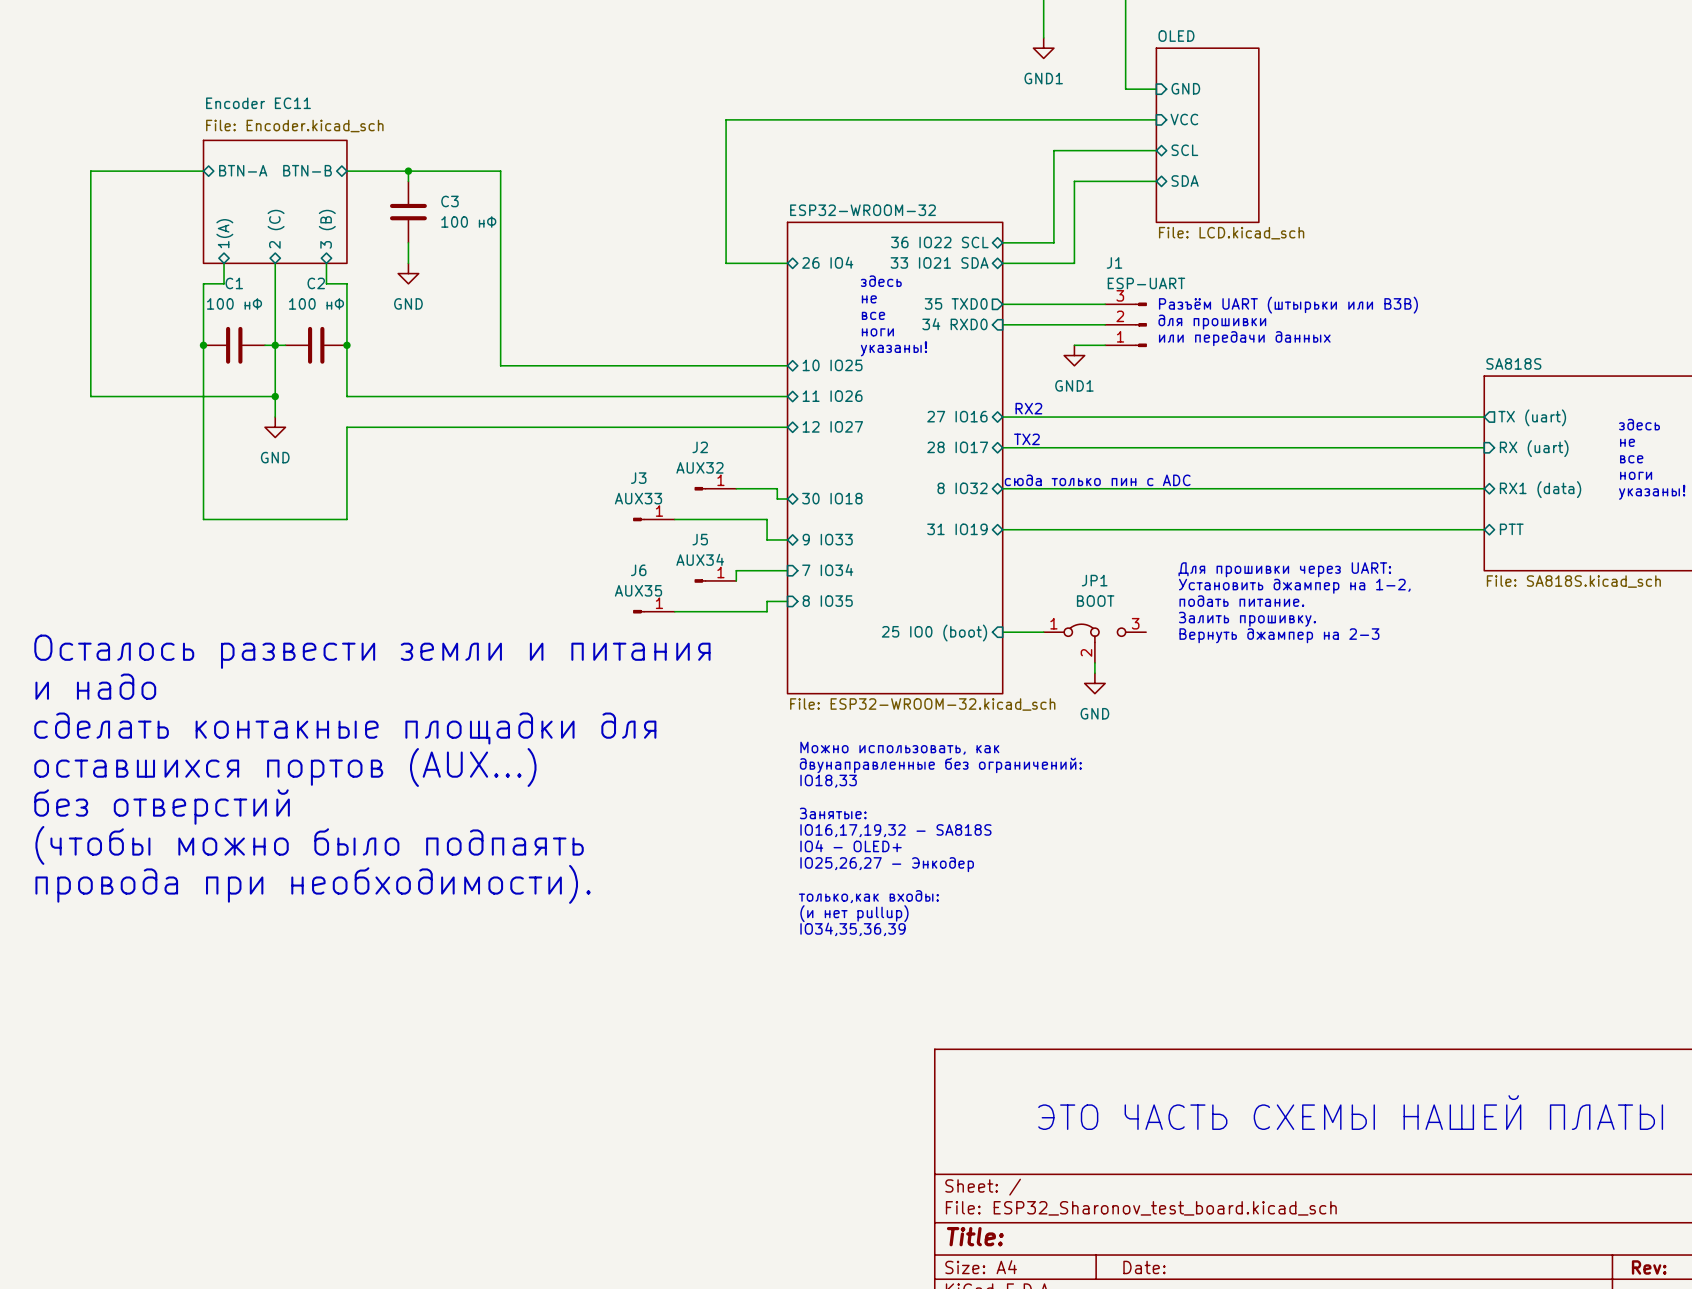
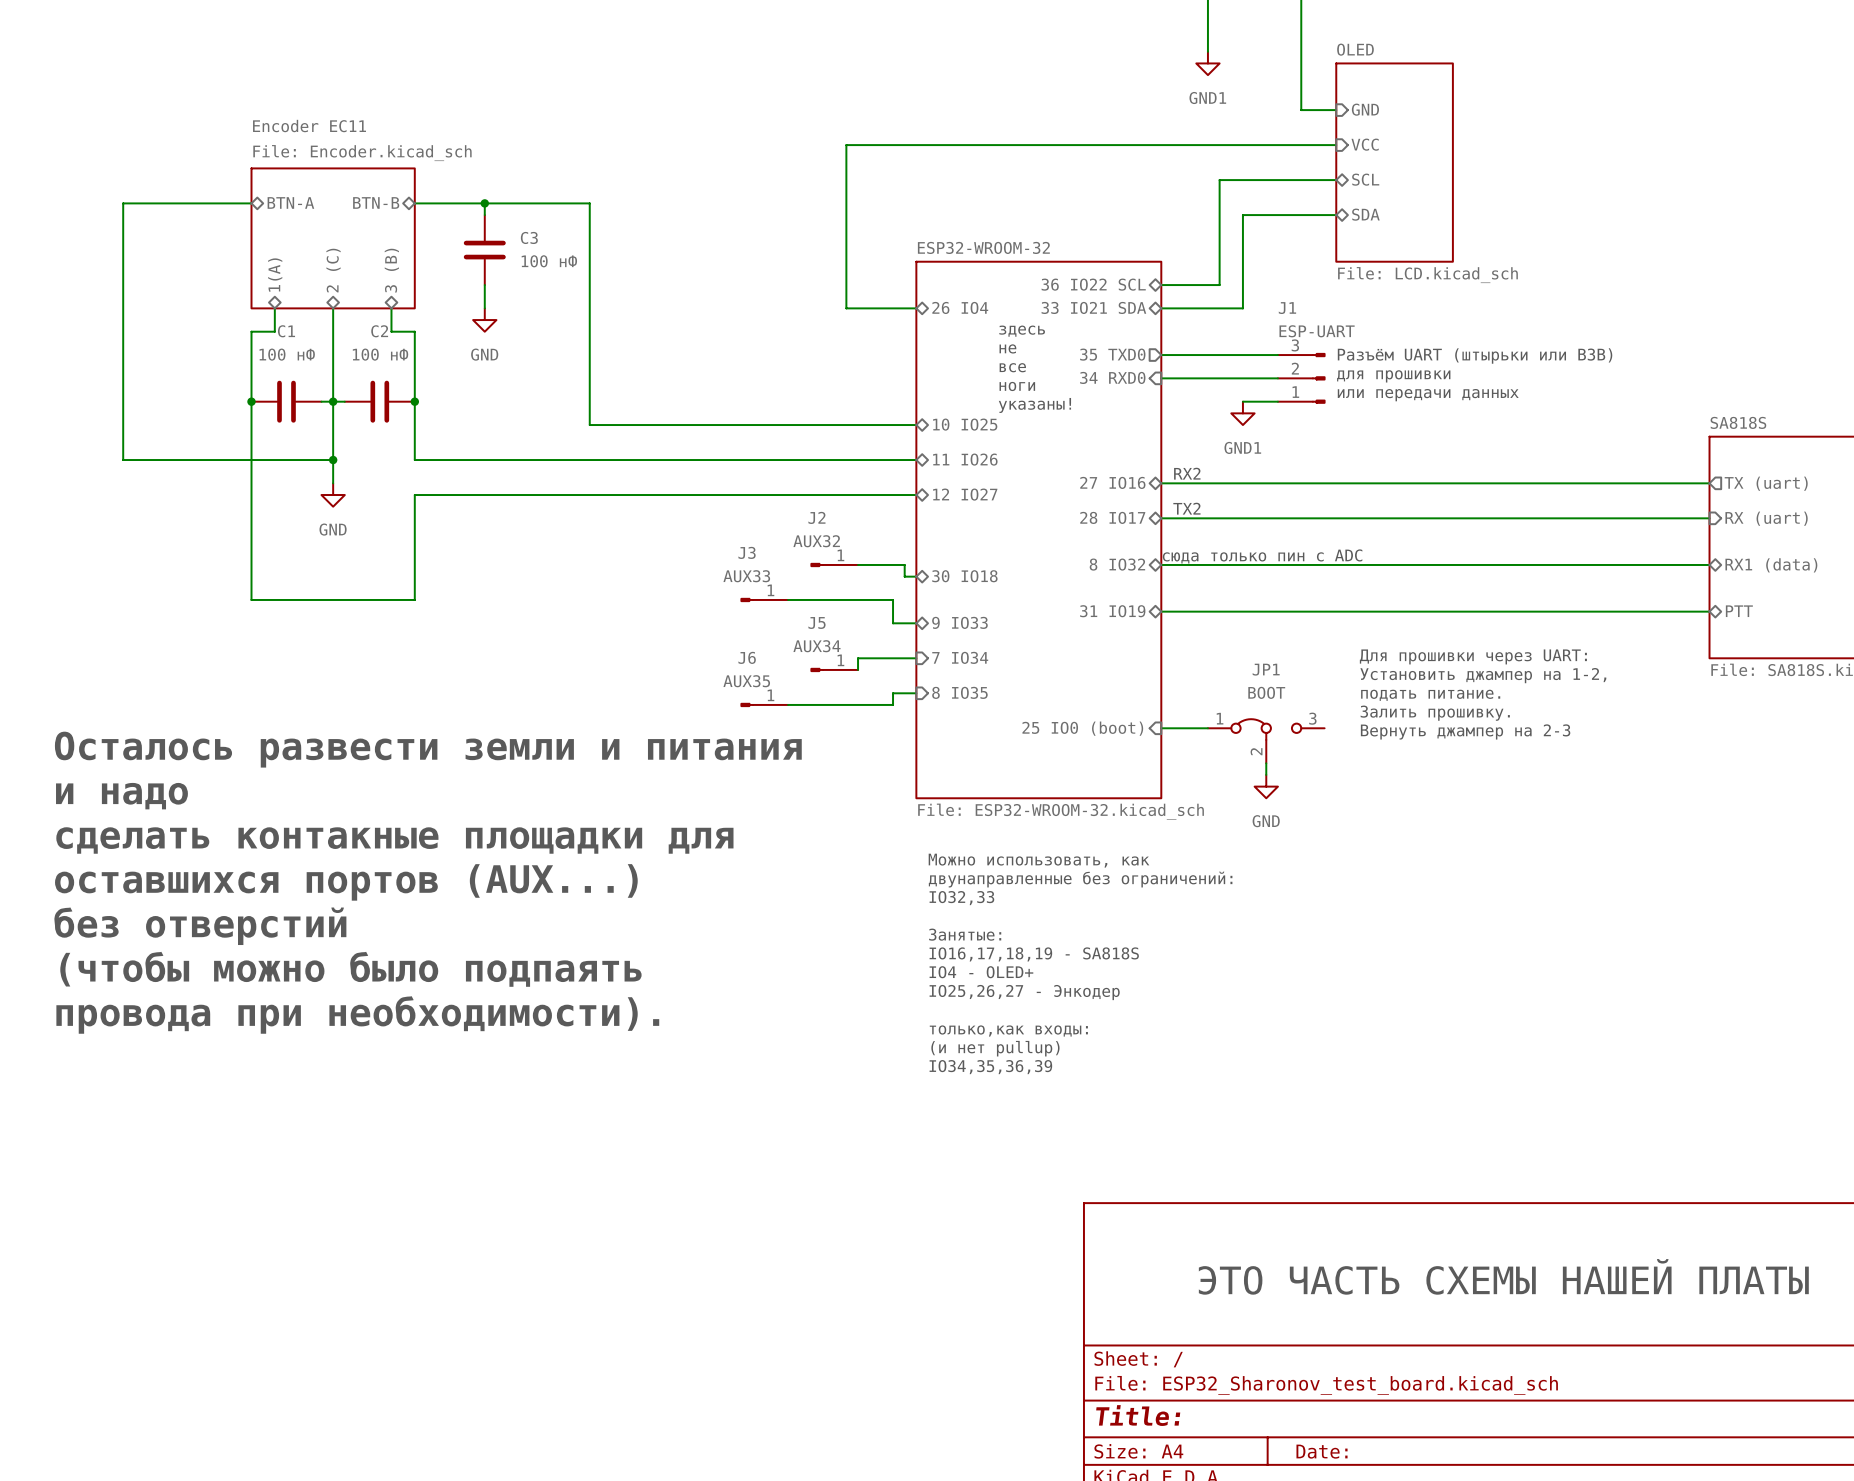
text: IO18,33 (828, 781) -> IO32,33 (961, 898)
text: IO16,17,19,32 - SA818S (895, 830) -> IO16,17,18,19 - SA818S (1034, 954)

